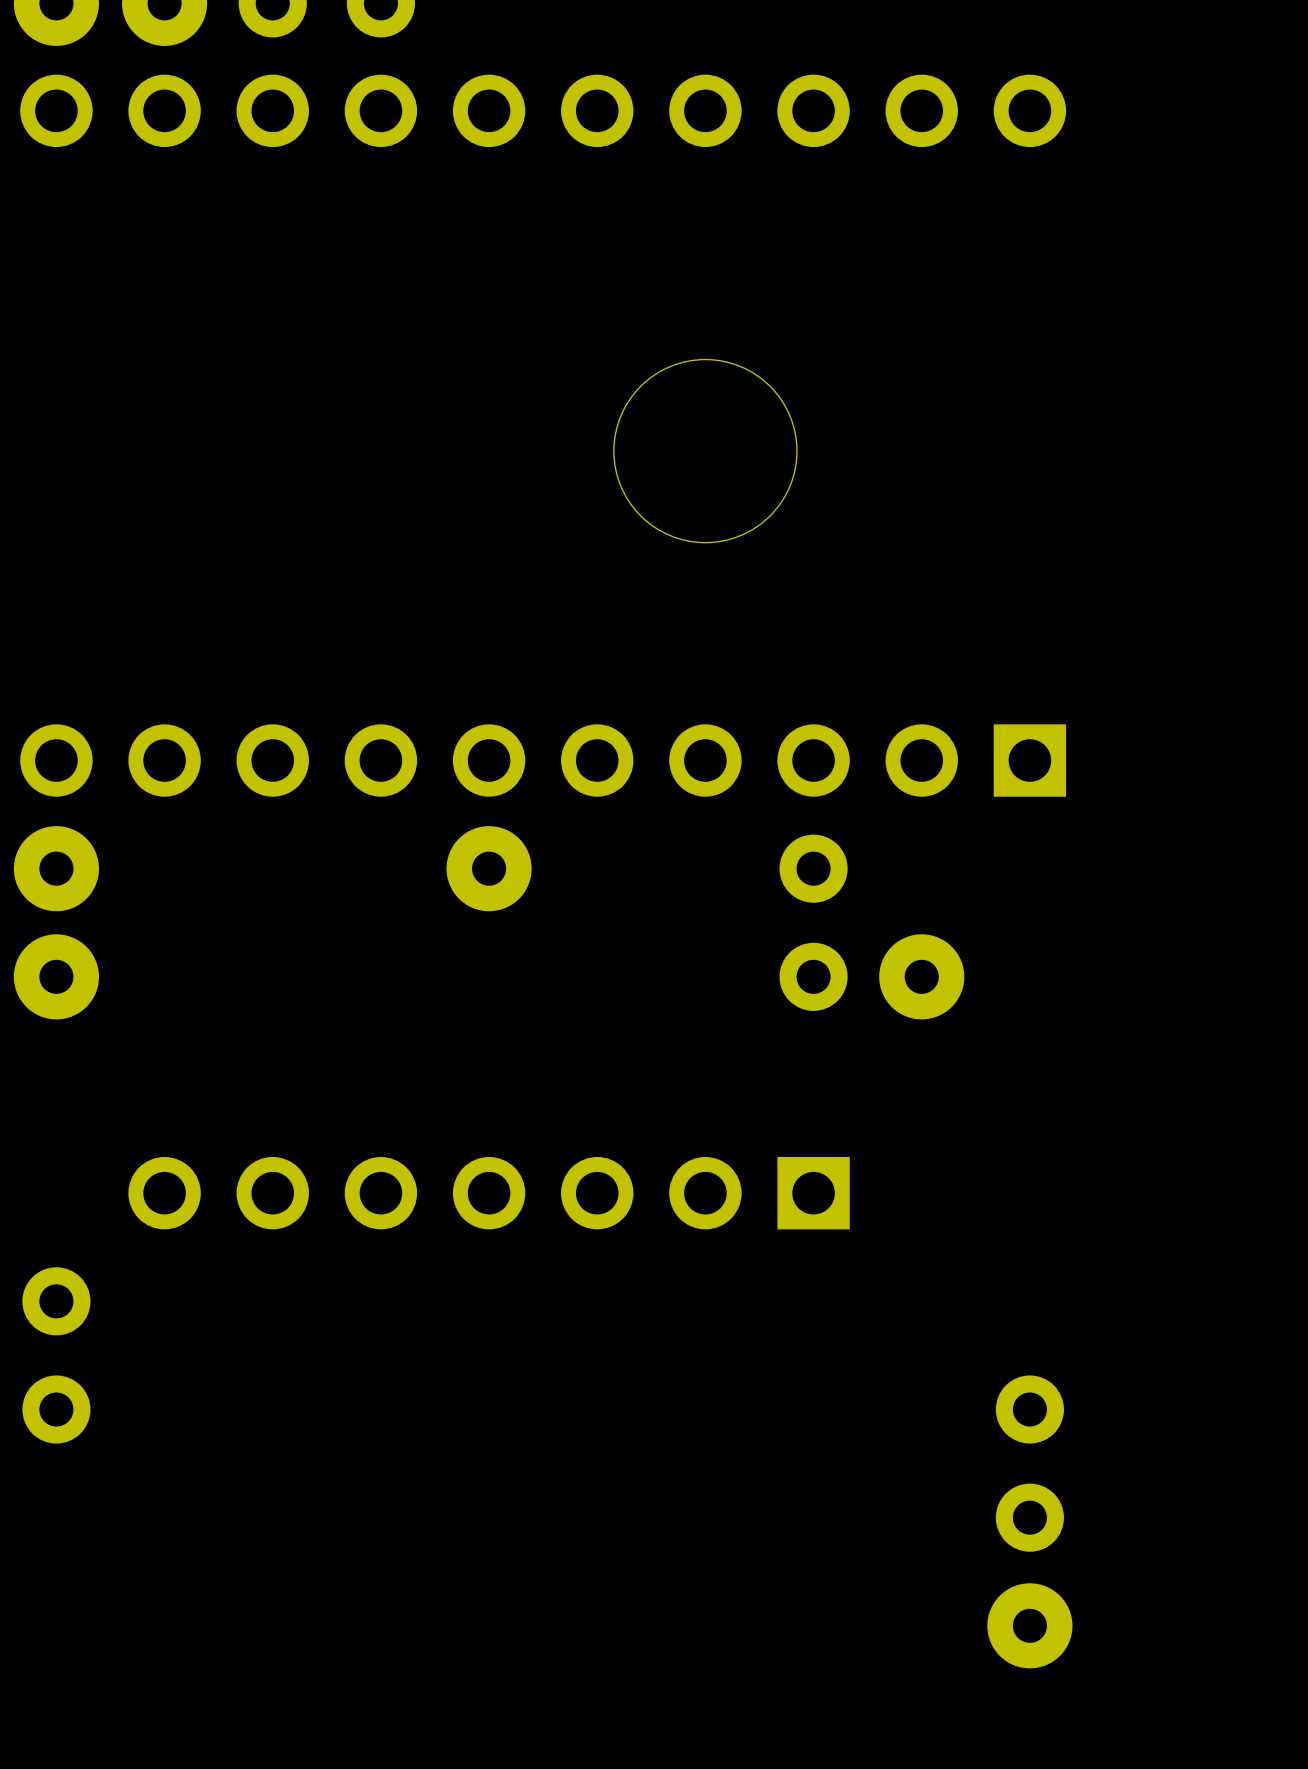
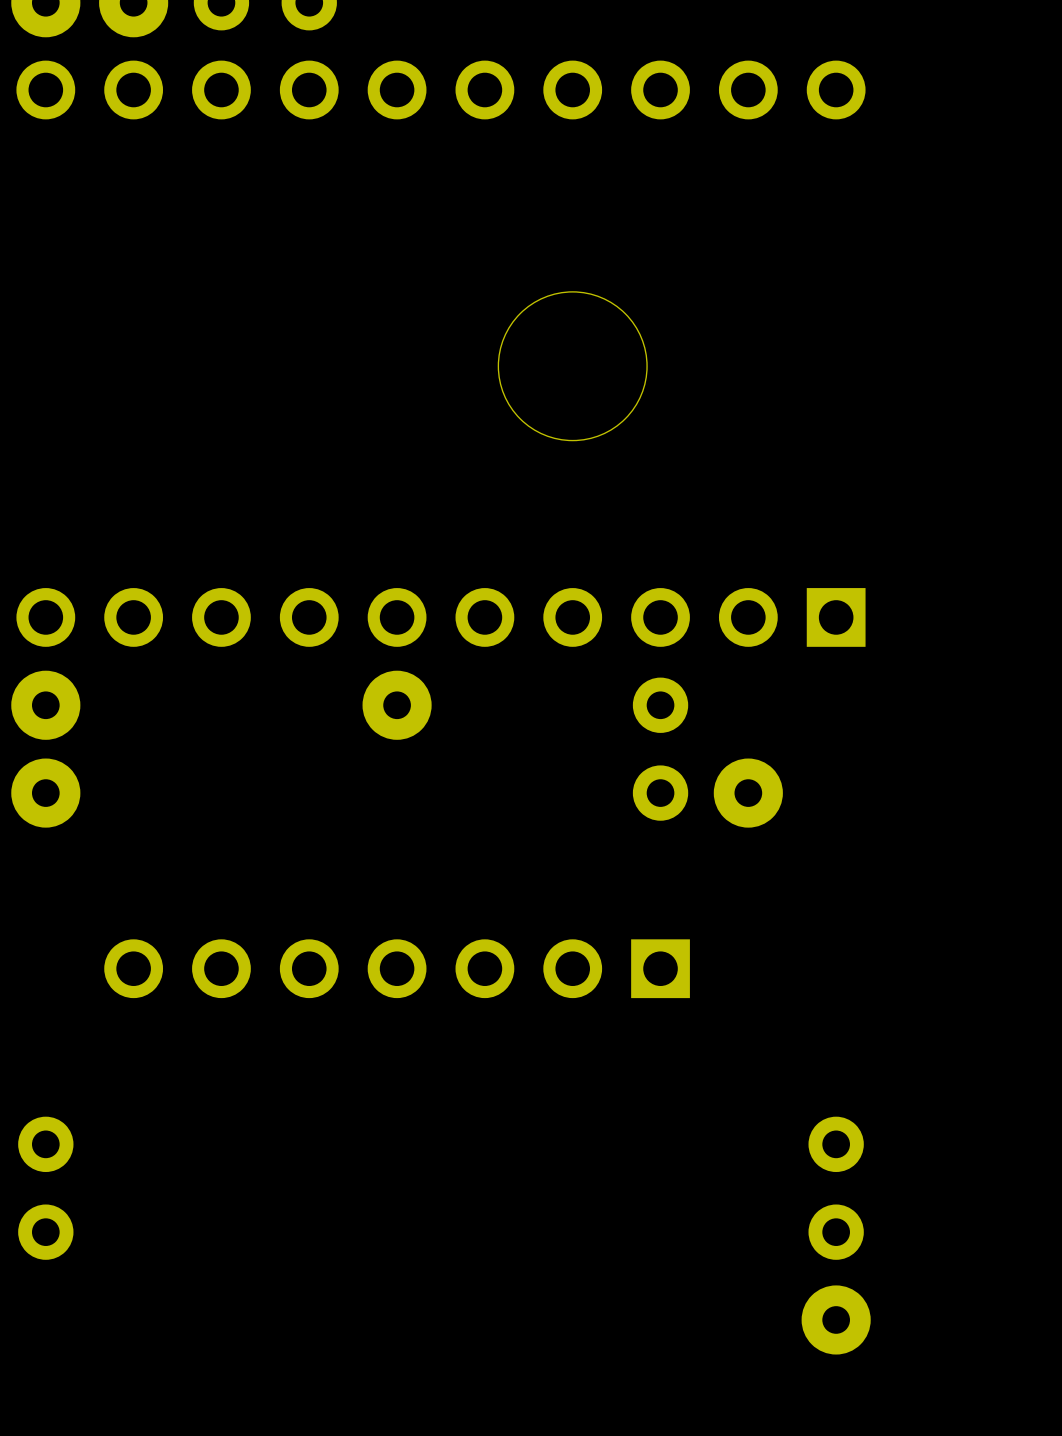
part position: (56, 1355) -> (45, 1188)

